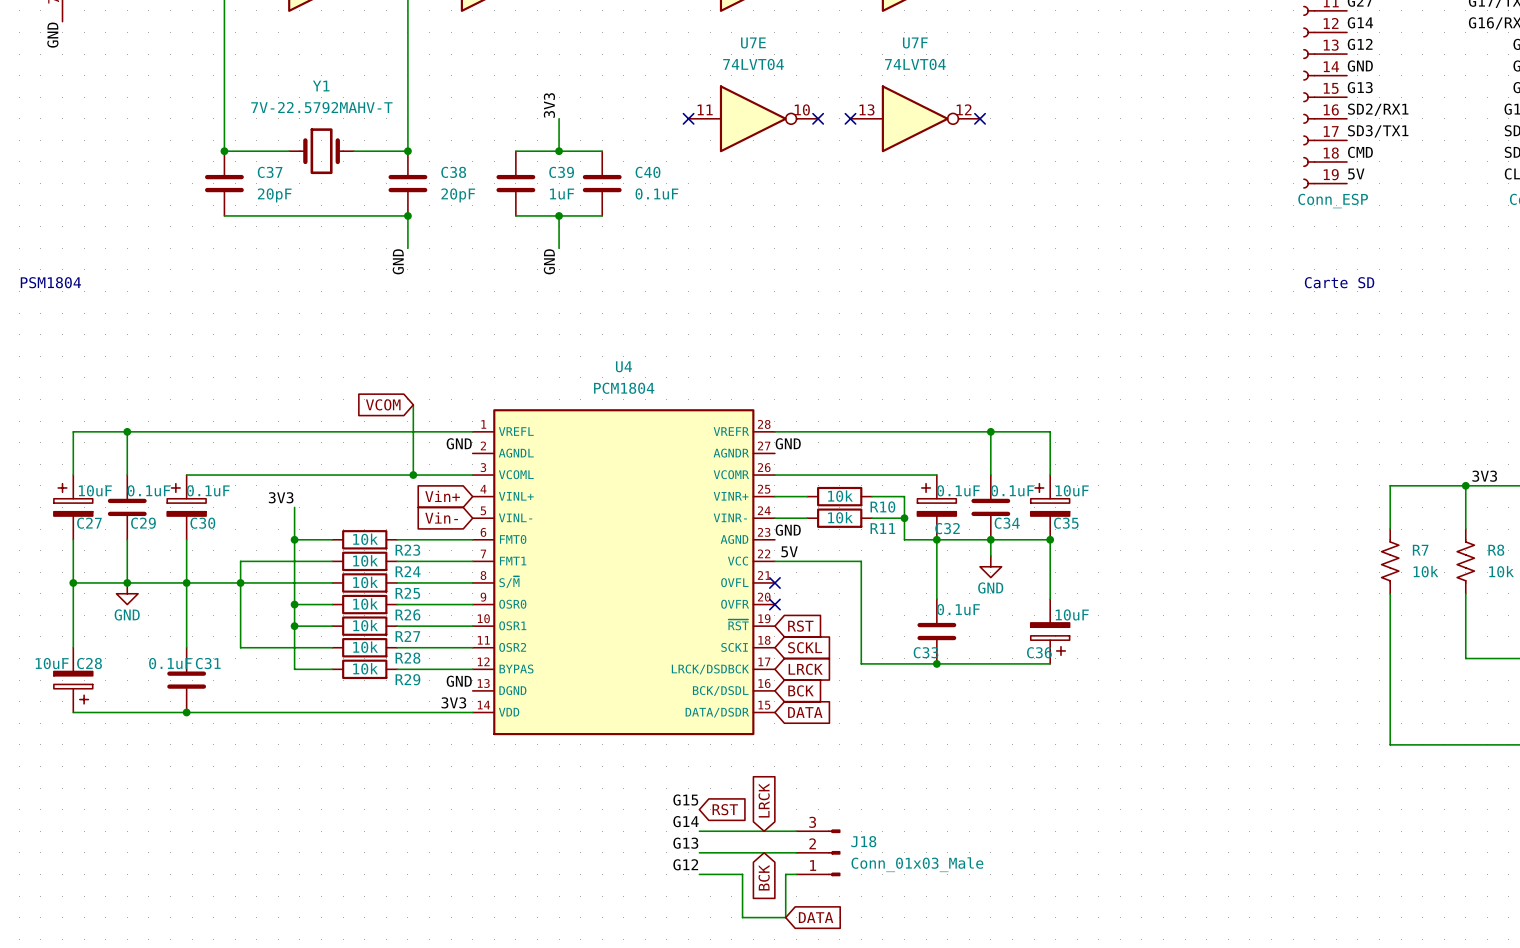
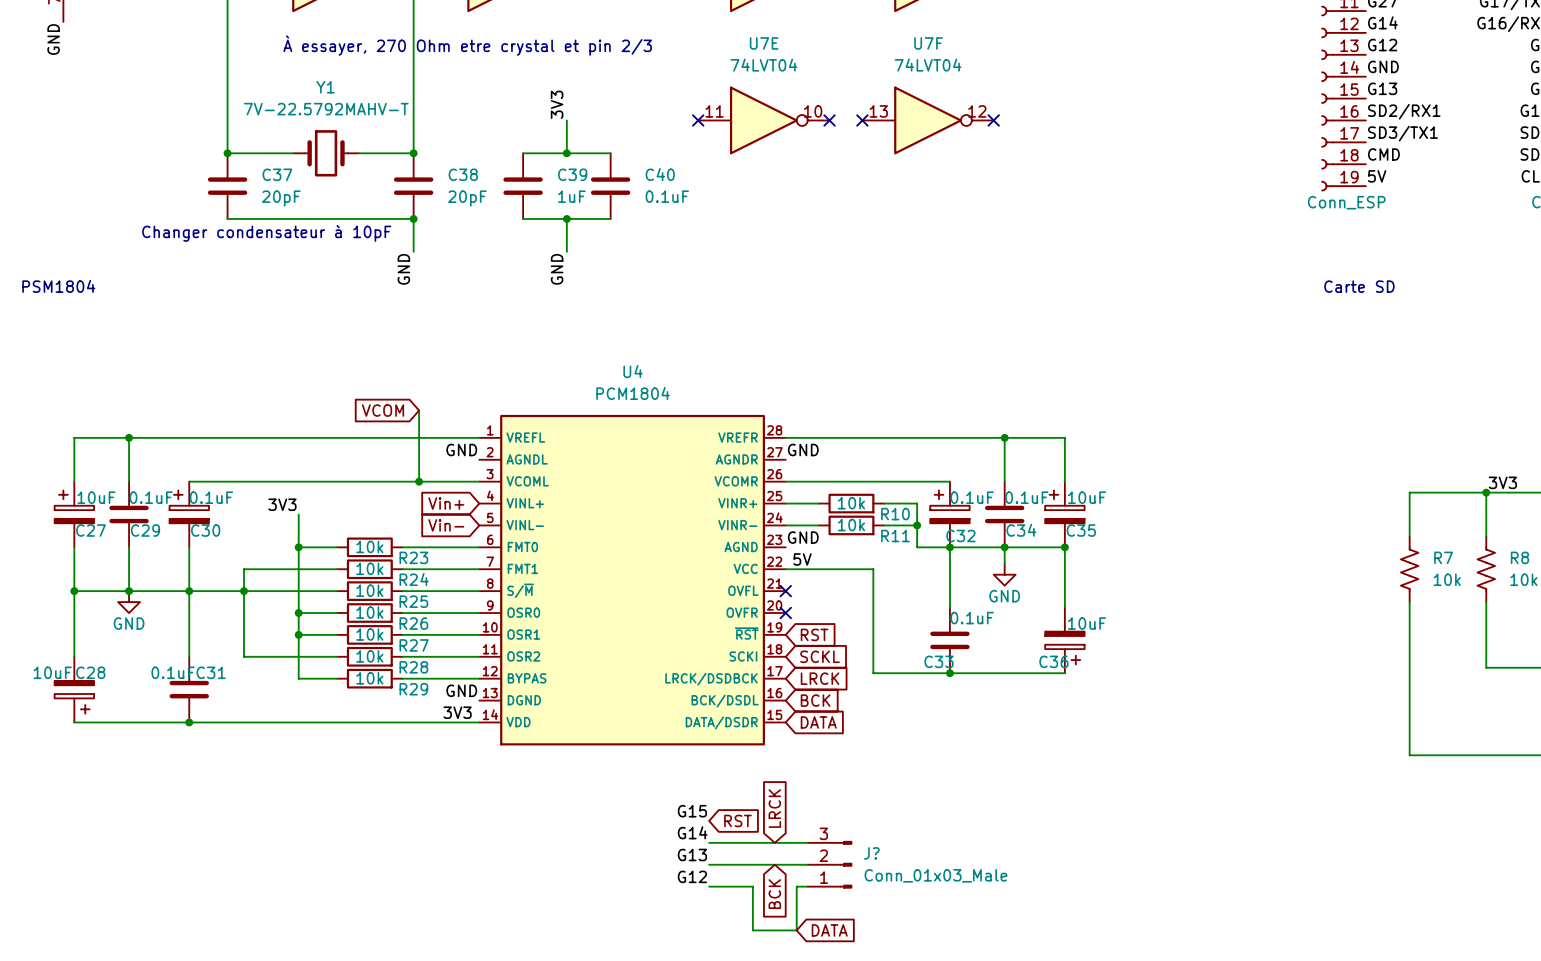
text: none -> À essayer, 270 Ohm etre crystal et pin 2/3 (467, 45)
text: none -> Changer condensateur à 10pF (266, 233)
J18 name: J18 (863, 841) -> J? (871, 853)

